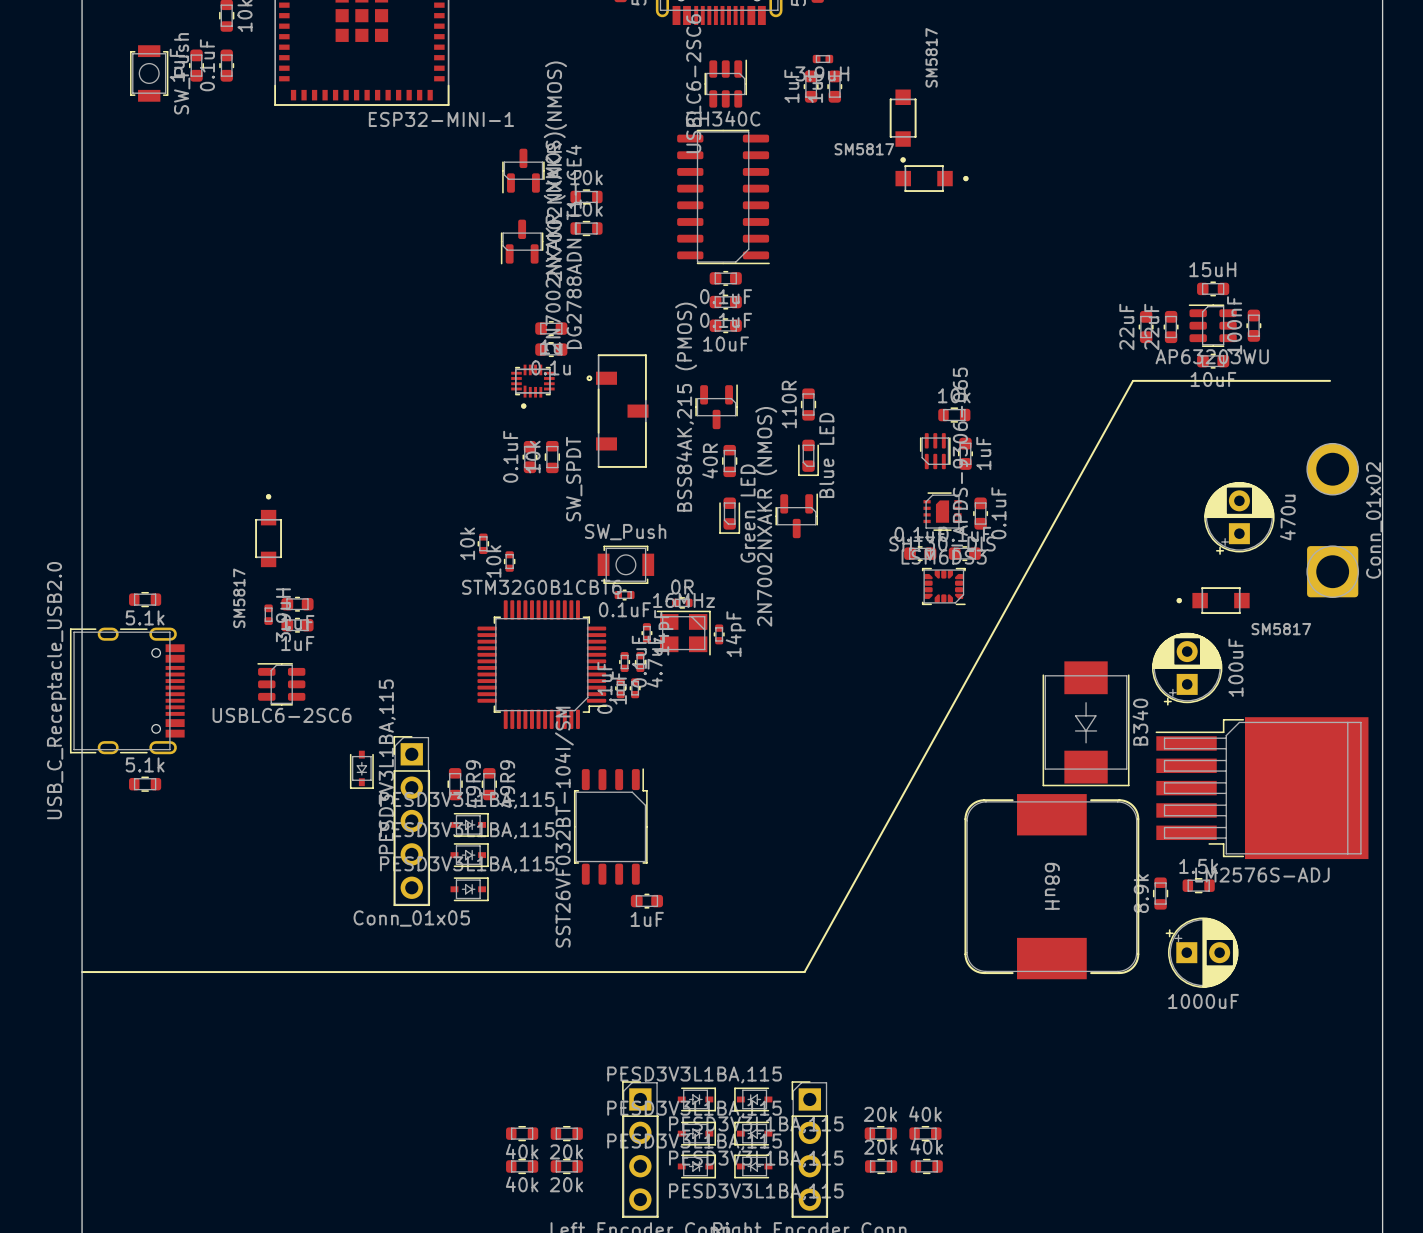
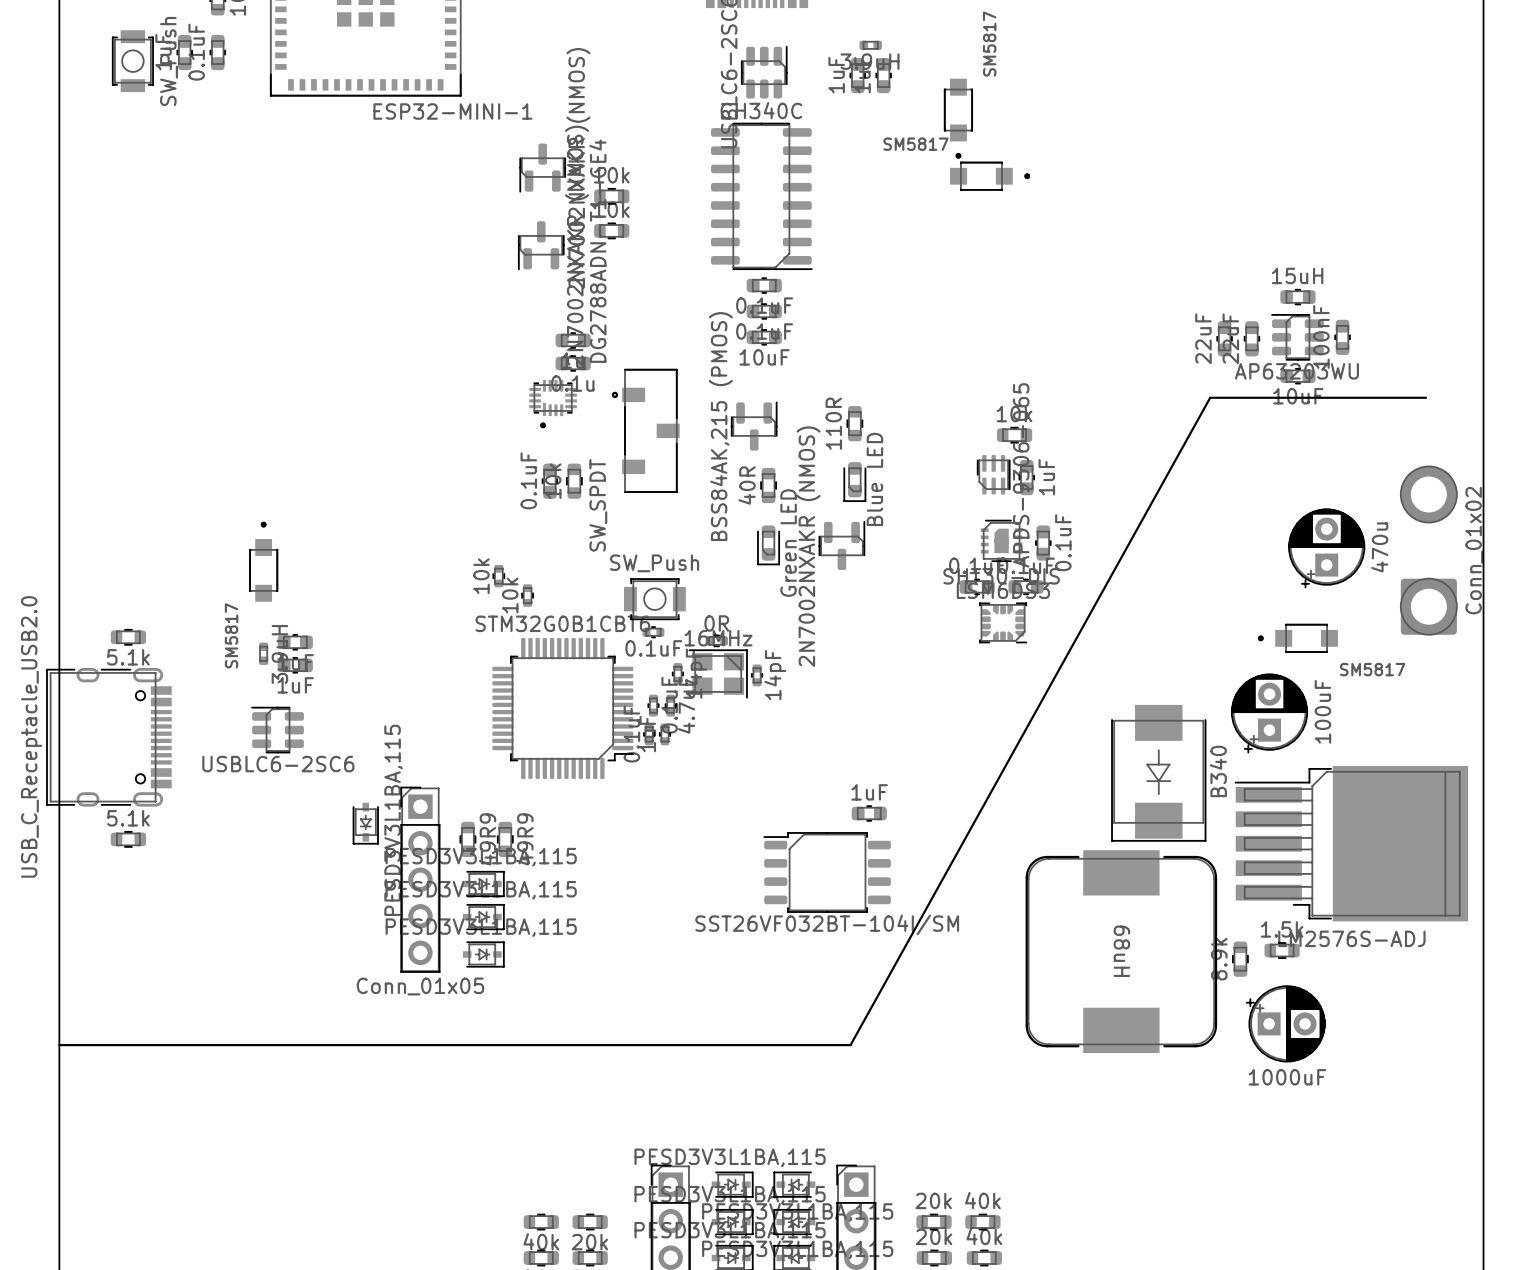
part rotation: 0° (610, 826) -> 90° counterclockwise (827, 872)
part position: (610, 826) -> (827, 872)
part position: (646, 901) -> (869, 813)
part value position: 1uF (647, 919) -> 1uF (869, 792)

